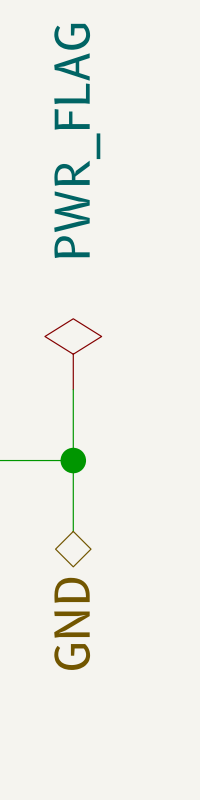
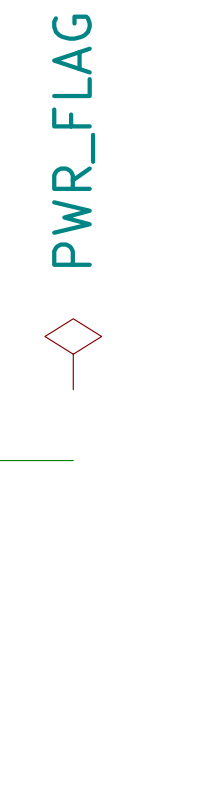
wire: (73, 389) (73, 531) -> none
junction: (73, 460) -> none
hierarchical label: GND (72, 623) -> none

